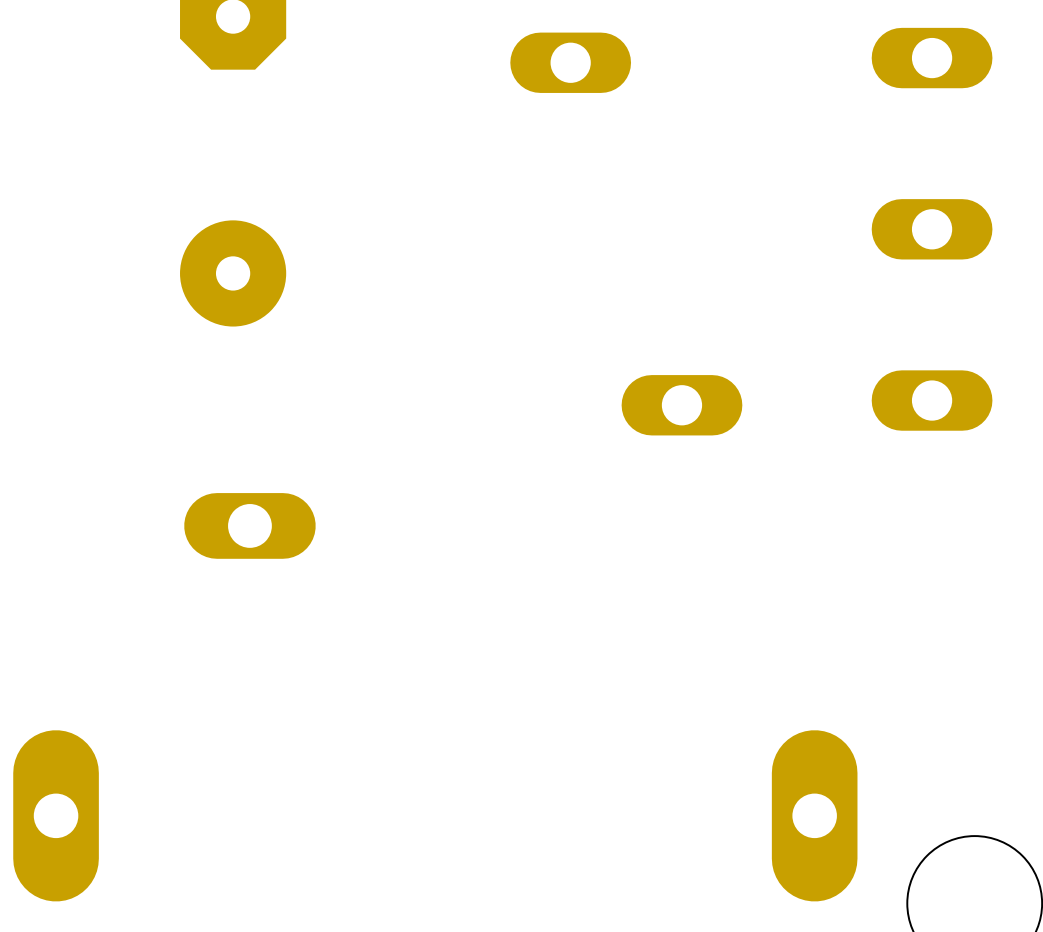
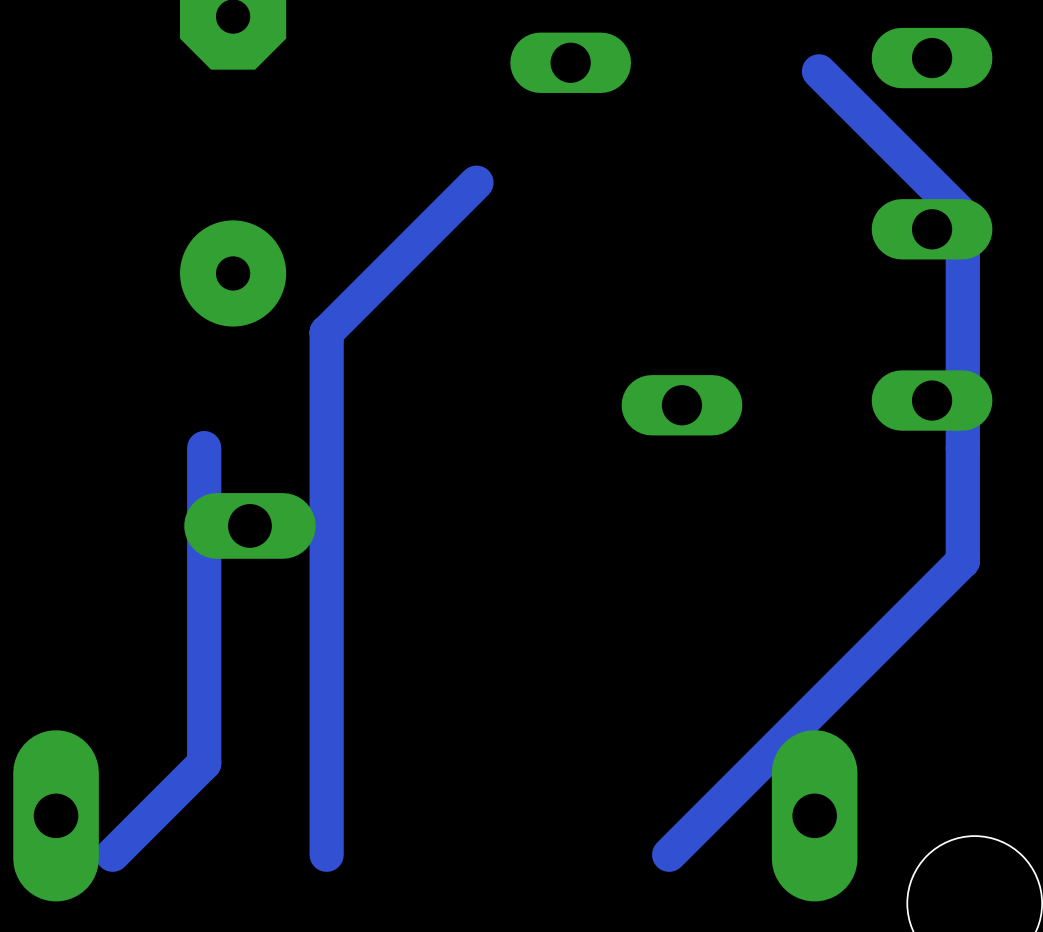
track: none -> (818, 71) (962, 215) (962, 561) (669, 854)
track: none -> (476, 182) (326, 332) (326, 854)
track: none -> (204, 448) (204, 763) (112, 854)

